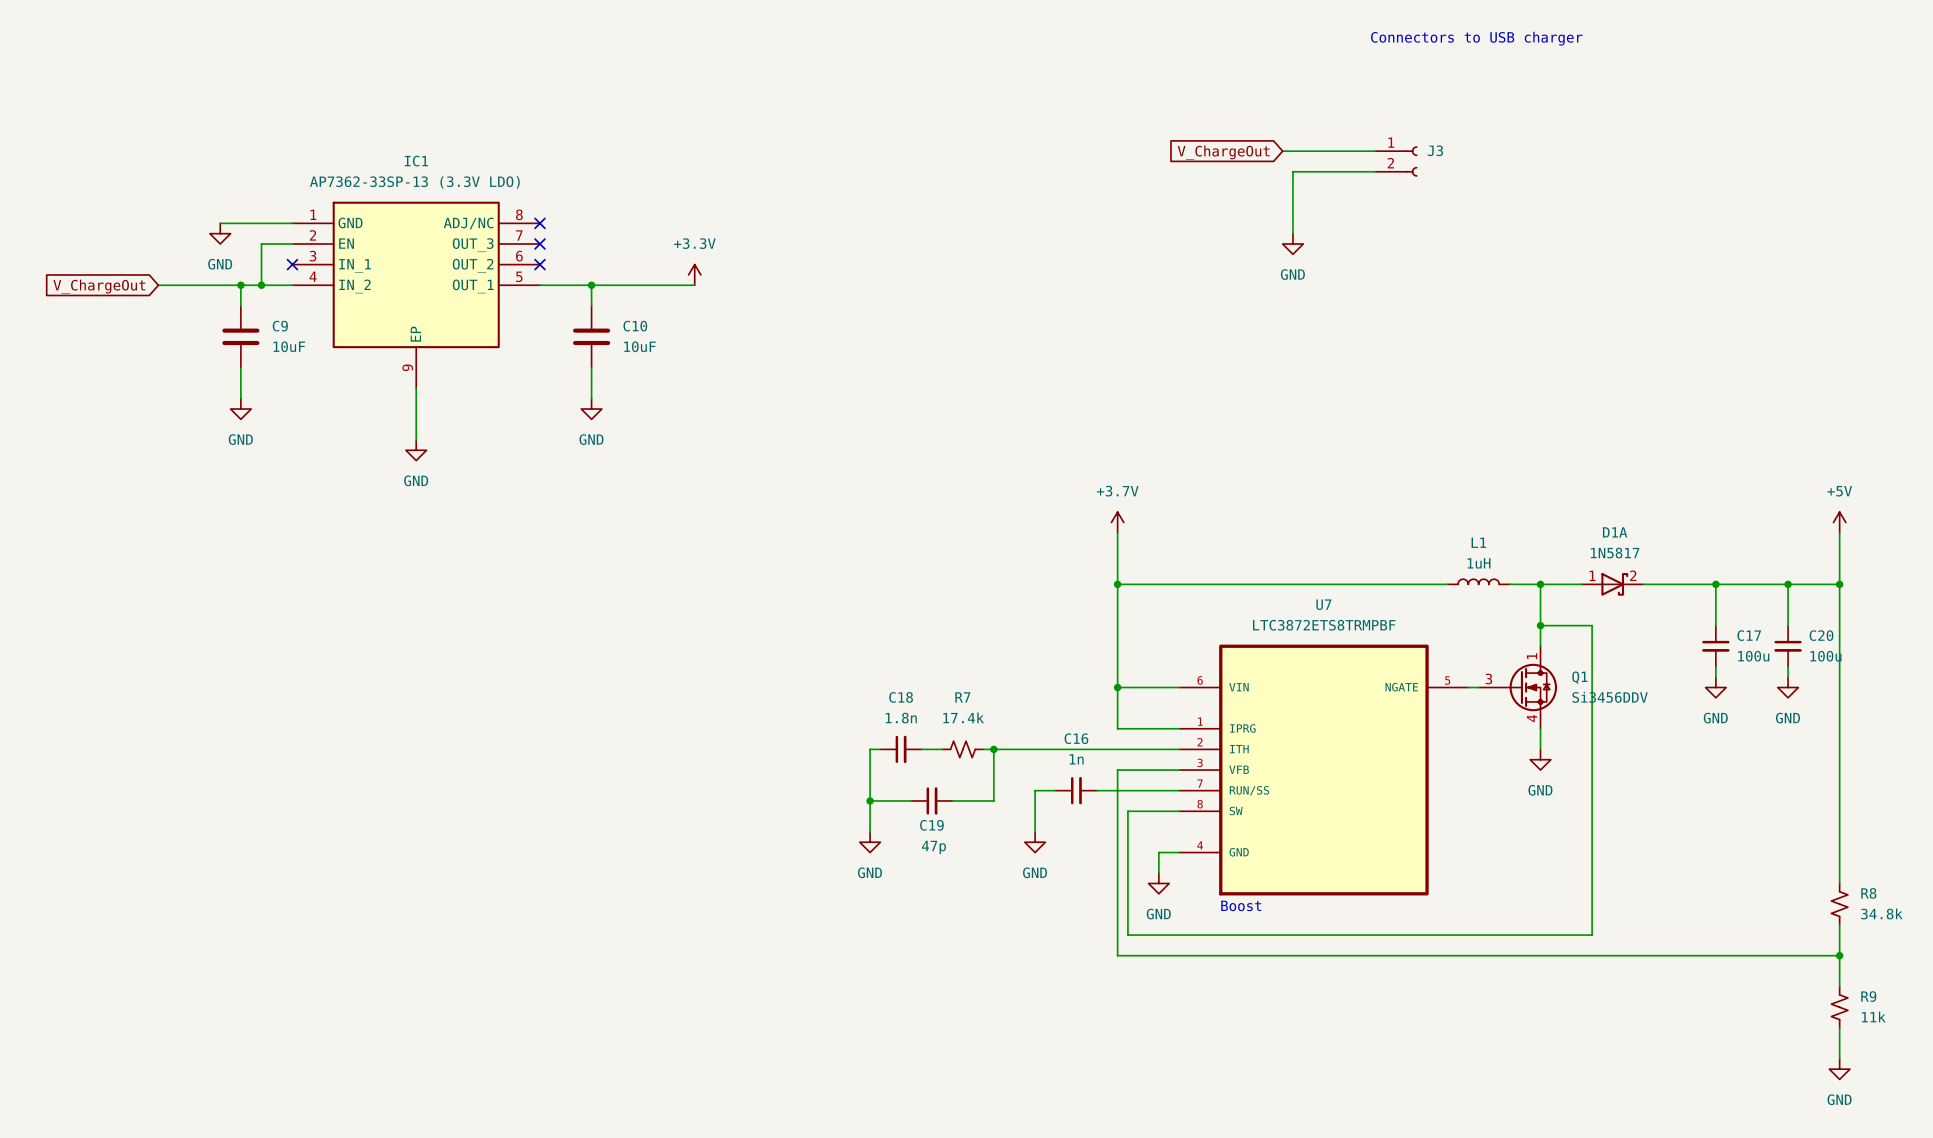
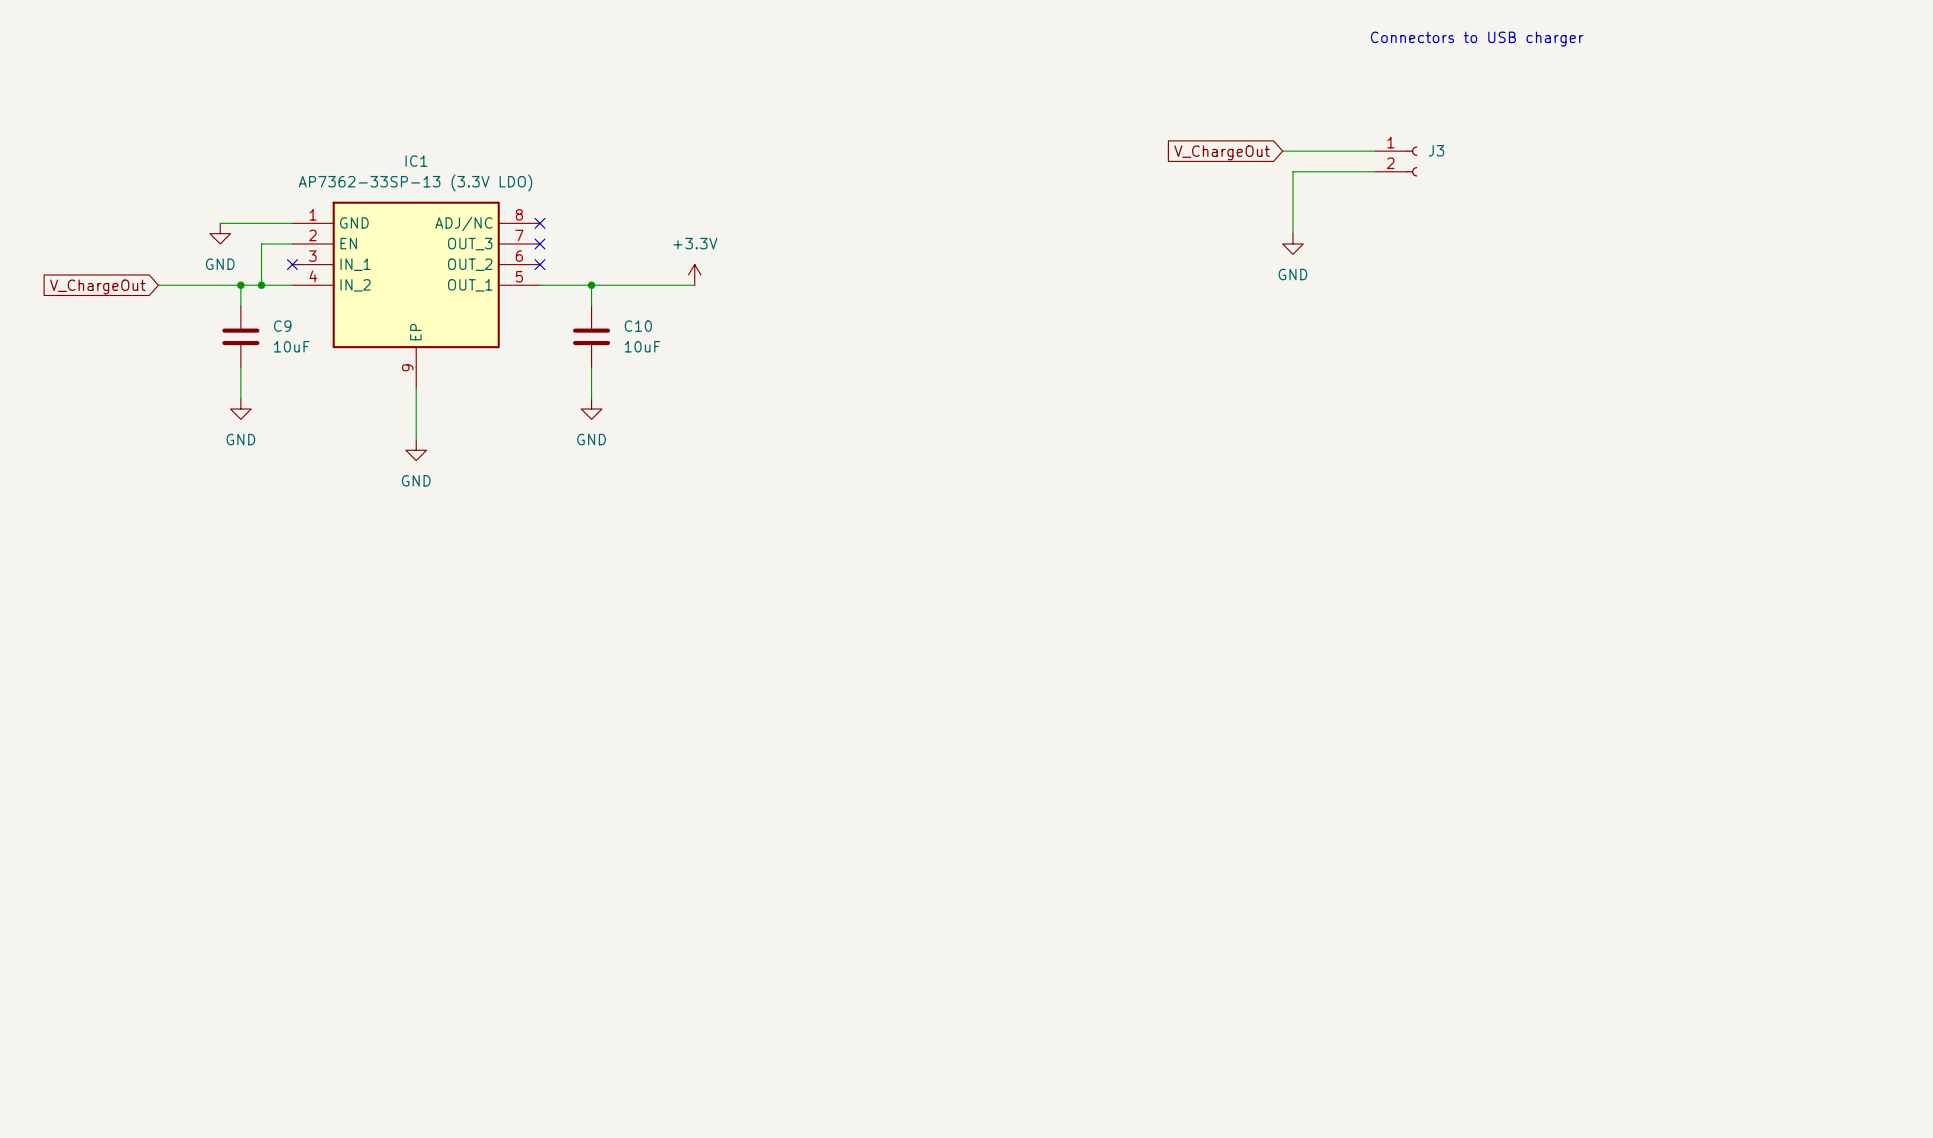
power symbol: +3.7V (1117, 522) -> none
power symbol: +5V (1839, 522) -> none
wire: (1117, 532) (1117, 728) (1179, 728) -> none
wire: (1839, 532) (1839, 883) -> none
L1: 1uH (1478, 581) -> none
wire: (1117, 584) (1447, 584) -> none
junction: (1117, 584) -> none
wire: (1509, 584) (1581, 584) -> none
wire: (1540, 584) (1540, 646) -> none
junction: (1540, 584) -> none
D1A: 1N5817 (1612, 584) -> none
wire: (1643, 584) (1839, 584) -> none
wire: (1715, 584) (1715, 625) -> none
junction: (1715, 584) -> none
wire: (1788, 584) (1788, 625) -> none
junction: (1788, 584) -> none
junction: (1839, 584) -> none
wire: (1540, 625) (1592, 625) (1592, 935) (1127, 935) (1127, 811) (1179, 811) -> none
junction: (1540, 625) -> none
C17: 100u (1715, 646) -> none
C20: 100u (1788, 646) -> none
wire: (1715, 666) (1715, 677) -> none
wire: (1788, 666) (1788, 677) -> none
wire: (1117, 687) (1179, 687) -> none
junction: (1117, 687) -> none
wire: (1468, 687) (1478, 687) -> none
Q1: Si3456DDV (1517, 687) -> none
power symbol: GND (1715, 687) -> none
power symbol: GND (1788, 687) -> none
wire: (1540, 728) (1540, 749) -> none
wire: (880, 749) (870, 749) (870, 831) -> none
C18: 1.8n (901, 749) -> none
wire: (921, 749) (942, 749) -> none
R7: 17.4k (962, 749) -> none
wire: (983, 749) (1179, 749) -> none
wire: (993, 749) (993, 800) (952, 800) -> none
junction: (993, 749) -> none
power symbol: GND (1540, 759) -> none
wire: (1179, 770) (1117, 770) (1117, 955) (1839, 955) -> none
U7: LTC3872ETS8TRMPBF (1323, 770) -> none
wire: (1055, 790) (1035, 790) (1035, 831) -> none
C16: 1n (1076, 790) -> none
wire: (1096, 790) (1179, 790) -> none
wire: (870, 800) (911, 800) -> none
junction: (870, 800) -> none
C19: 47p (931, 800) -> none
power symbol: GND (870, 842) -> none
power symbol: GND (1035, 842) -> none
wire: (1179, 852) (1158, 852) (1158, 873) -> none
power symbol: GND (1158, 883) -> none
R8: 34.8k (1839, 904) -> none
text: Boost (1241, 905) -> none
wire: (1839, 924) (1839, 986) -> none
junction: (1839, 955) -> none
R9: 11k (1839, 1007) -> none
wire: (1839, 1027) (1839, 1058) -> none
power symbol: GND (1839, 1069) -> none

